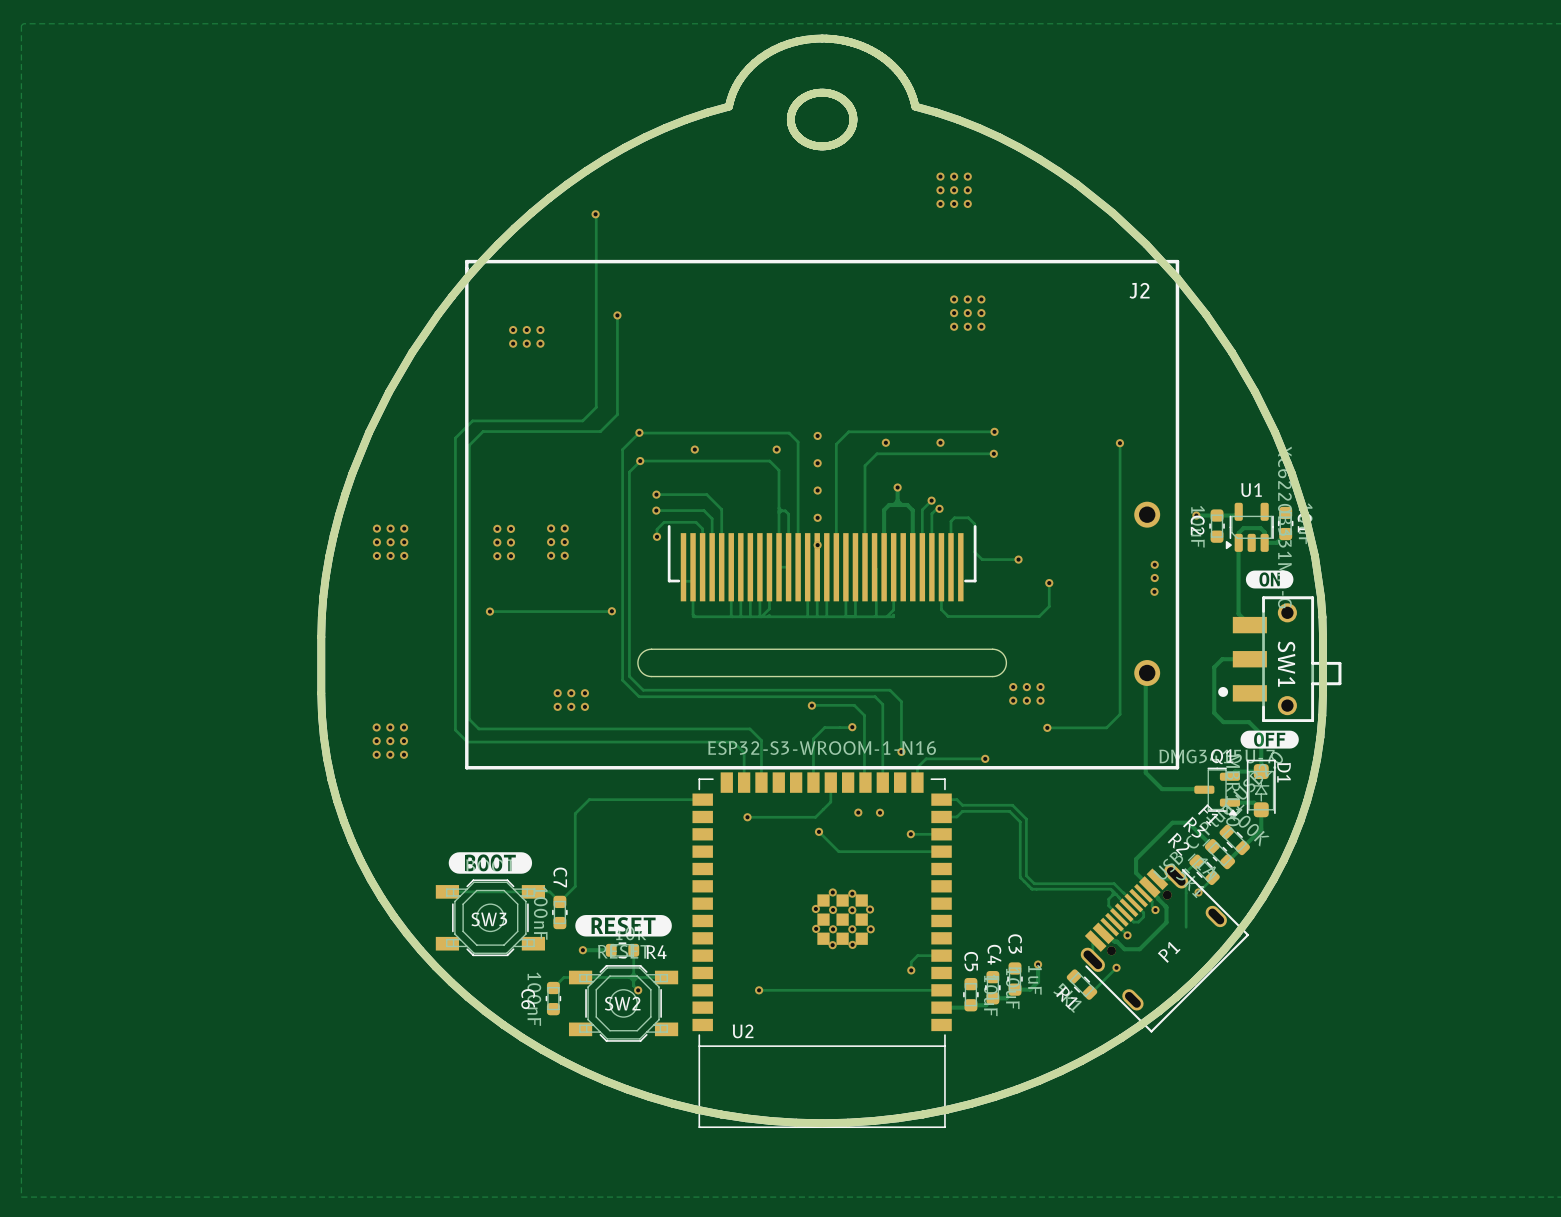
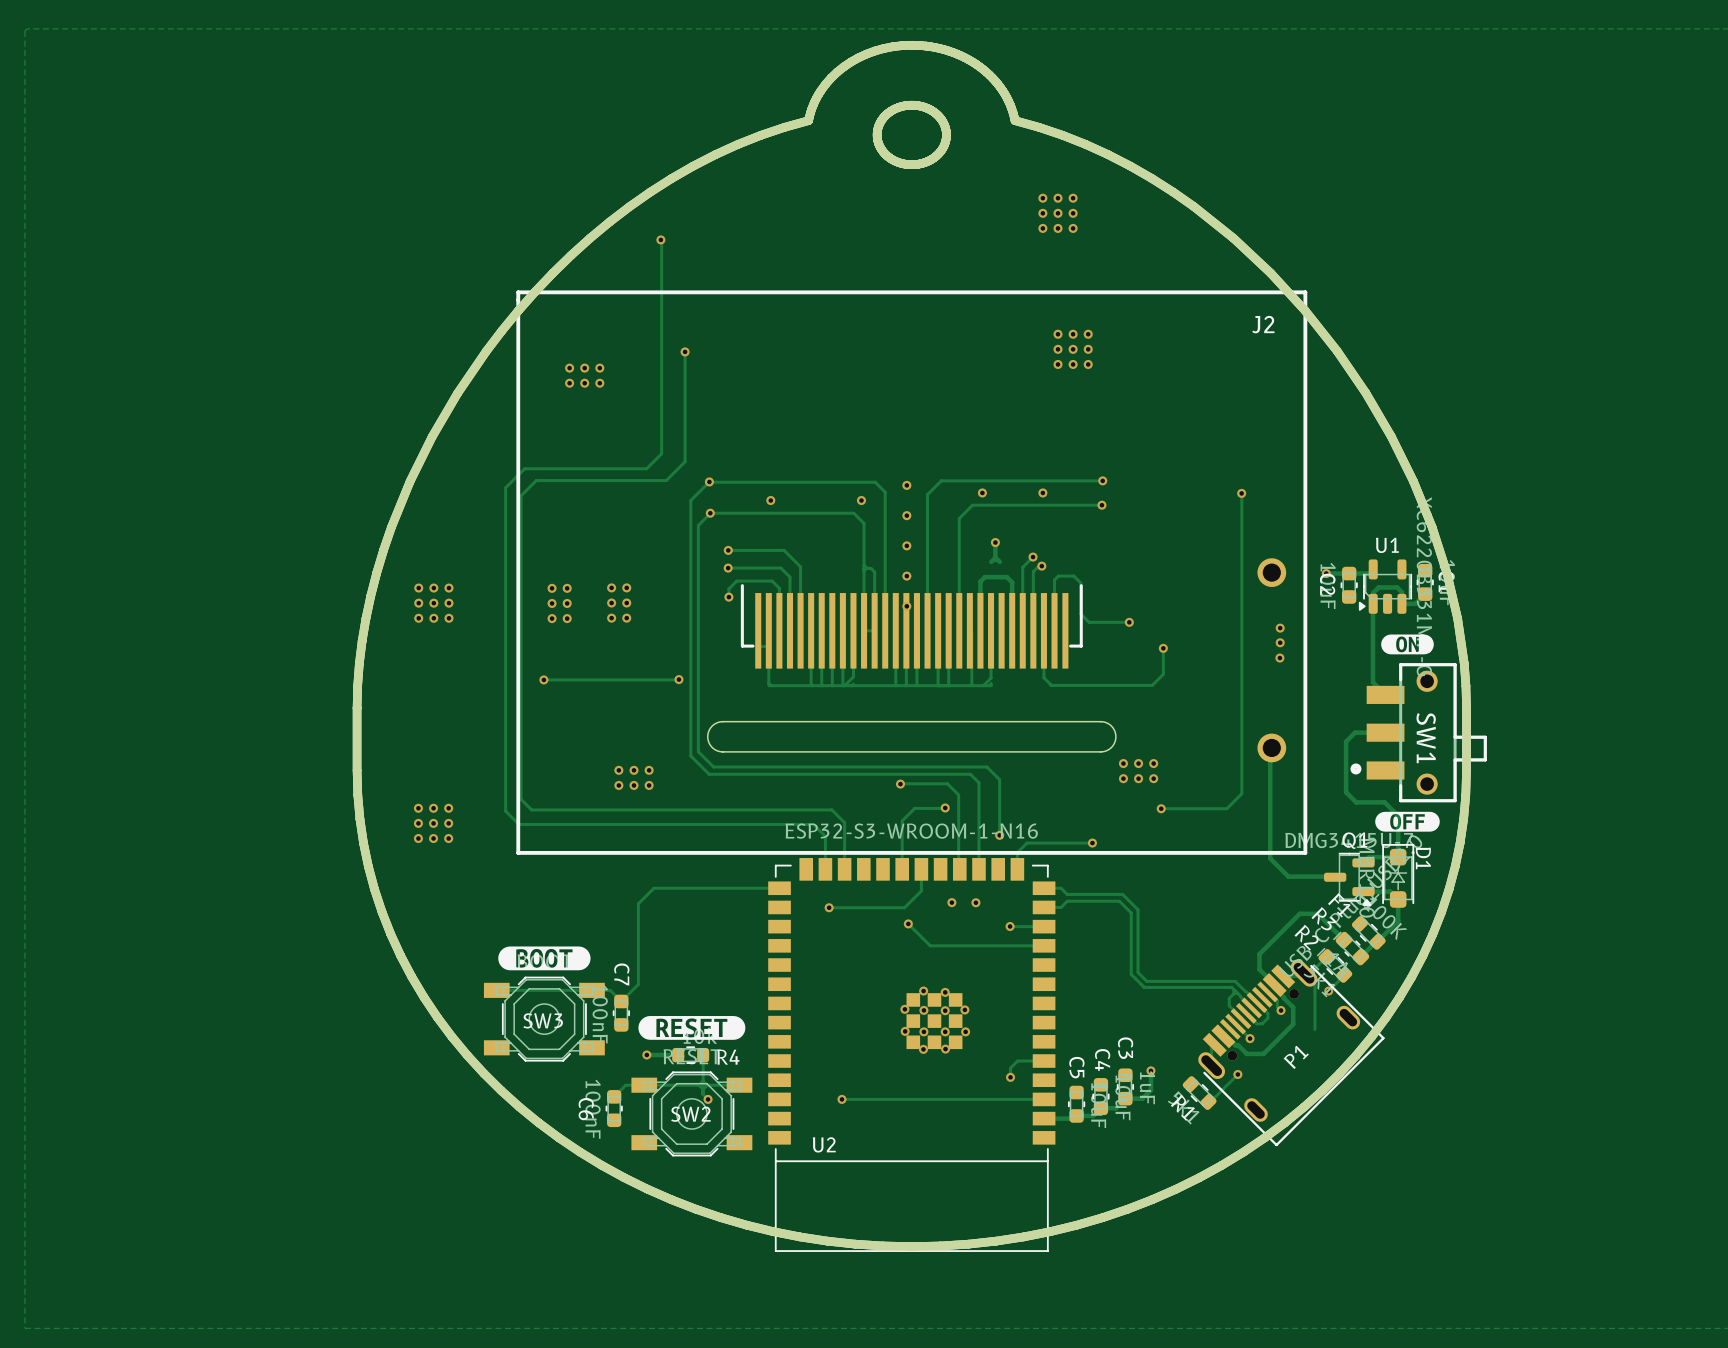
track: (884, 522) (884, 510) (889, 504) (907, 504) (912, 510) (912, 523) -> (980, 581) (984, 577) (1006, 577) (1012, 582)

